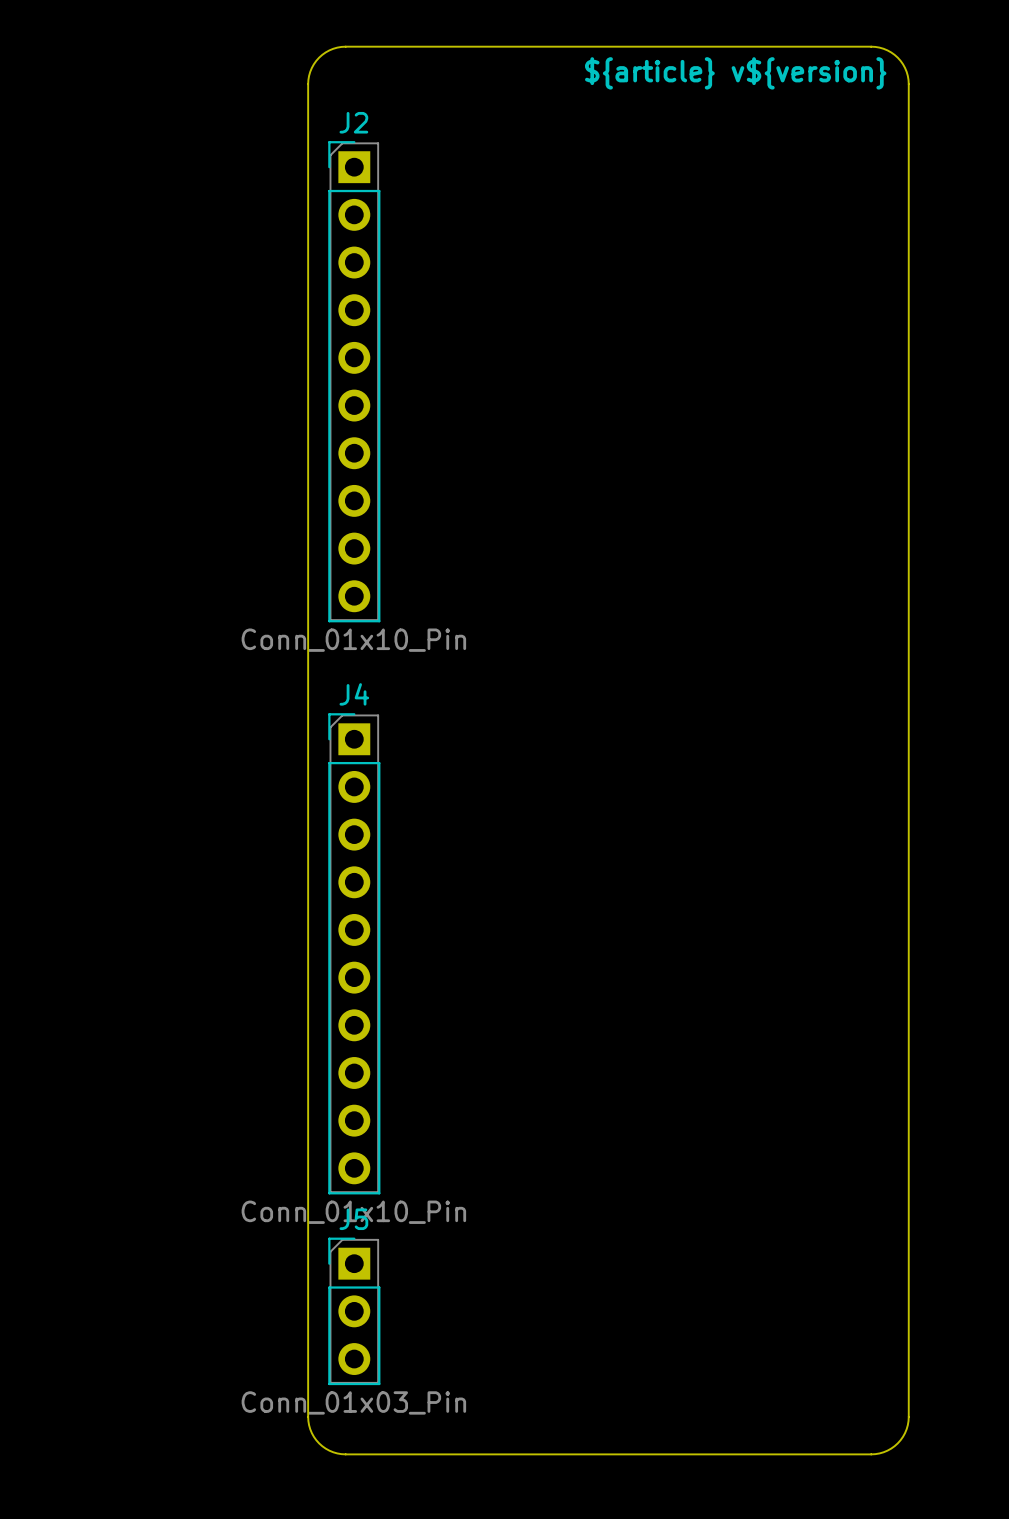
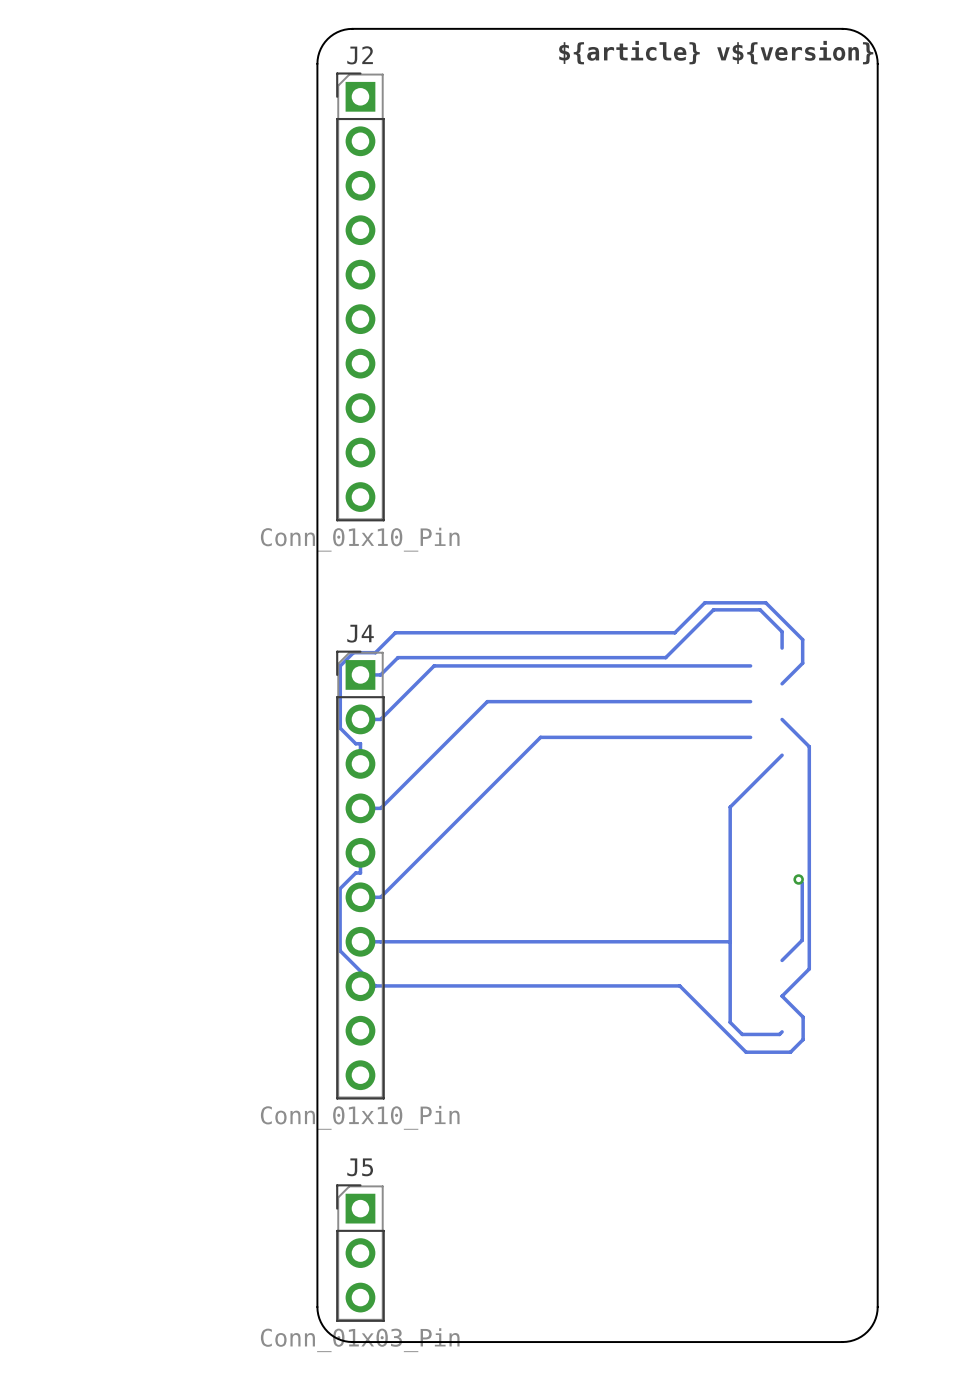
J2 position: (354, 381) -> (360, 296)
track: none -> (782, 648) (782, 631) (760, 609) (713, 609) (665, 657) (397, 657) (380, 674) (360, 674)
track: none -> (750, 665) (434, 665) (380, 719) (360, 719)
track: none -> (782, 683) (802, 663) (802, 639) (765, 602) (704, 602) (674, 632) (395, 632) (375, 652) (353, 652) (340, 665) (340, 728) (355, 743) (360, 743) (360, 763)
track: none -> (750, 701) (487, 701) (380, 808) (360, 808)
track: none -> (782, 719) (809, 746) (809, 968) (782, 996) (803, 1017) (803, 1039) (790, 1052) (746, 1052) (679, 985) (375, 985) (340, 950) (340, 888) (355, 873) (360, 873) (360, 852)
track: none -> (750, 737) (540, 737) (380, 897) (360, 897)
track: none -> (782, 755) (730, 807) (730, 1022) (742, 1034) (779, 1034) (782, 1031)
track: none -> (798, 879) (802, 883) (802, 940) (782, 960)
via: none -> (798, 879)
track: none -> (730, 941) (360, 941)
J5 position: (354, 1311) -> (360, 1253)

